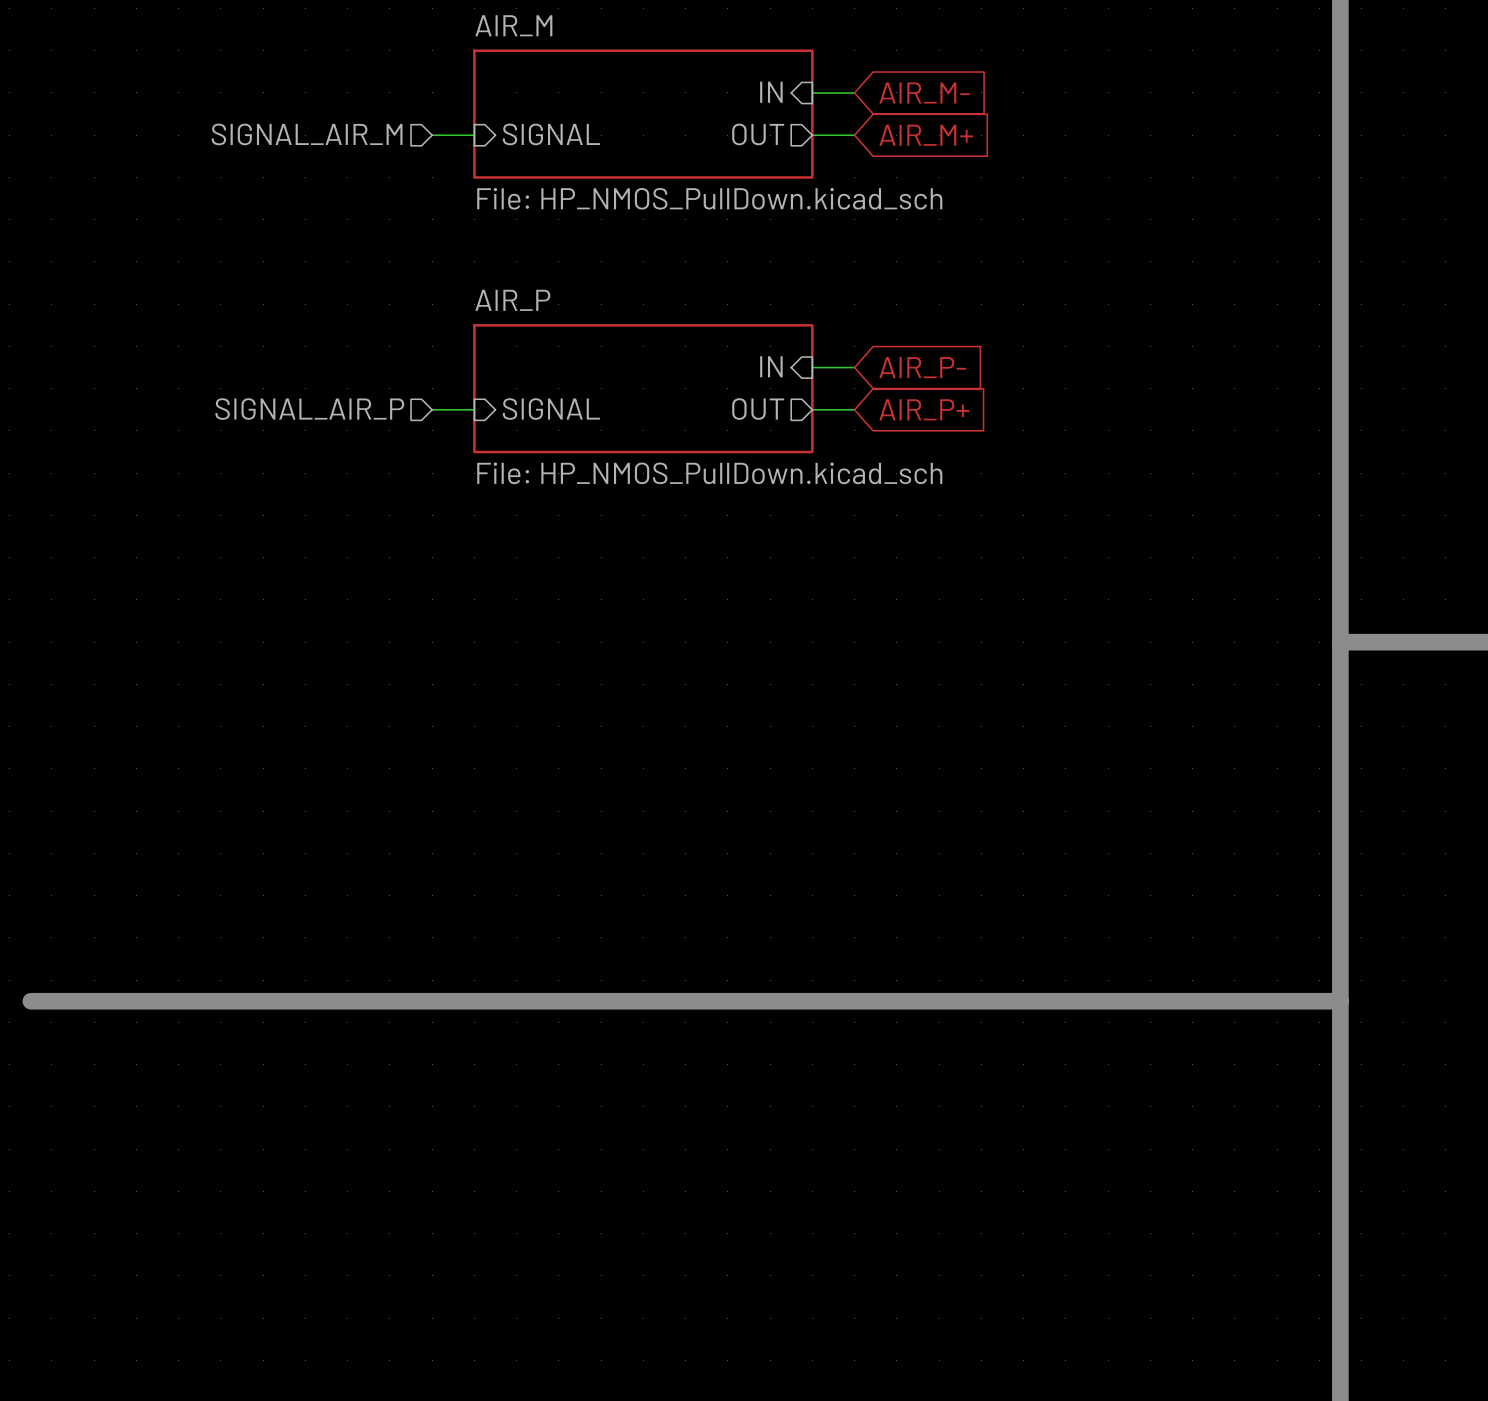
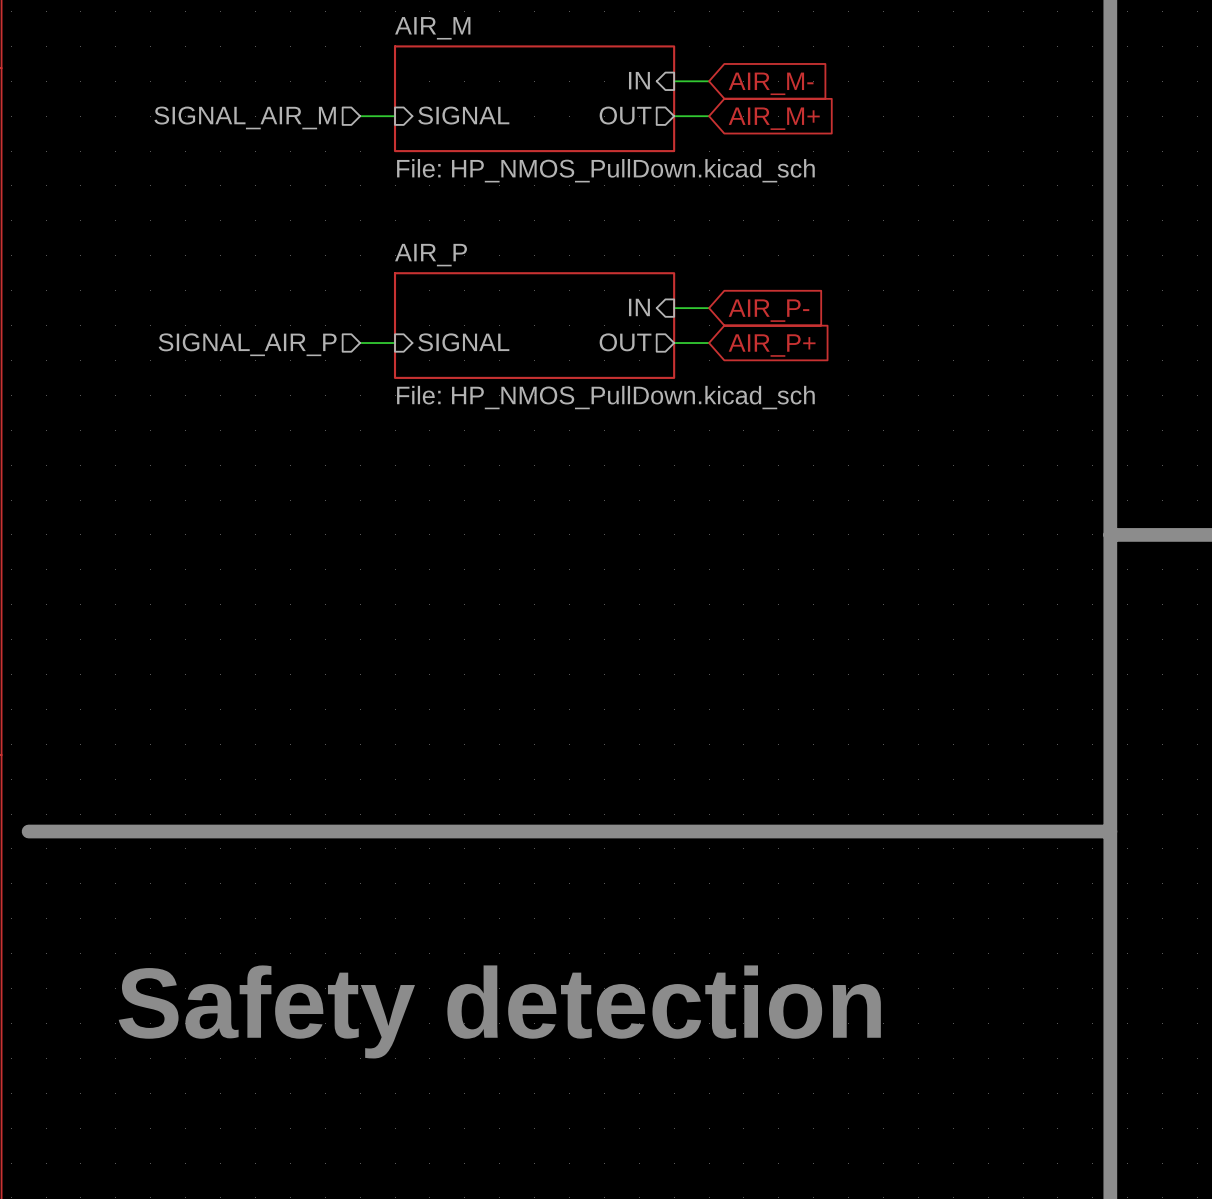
text: none -> Safety detection (499, 1011)

